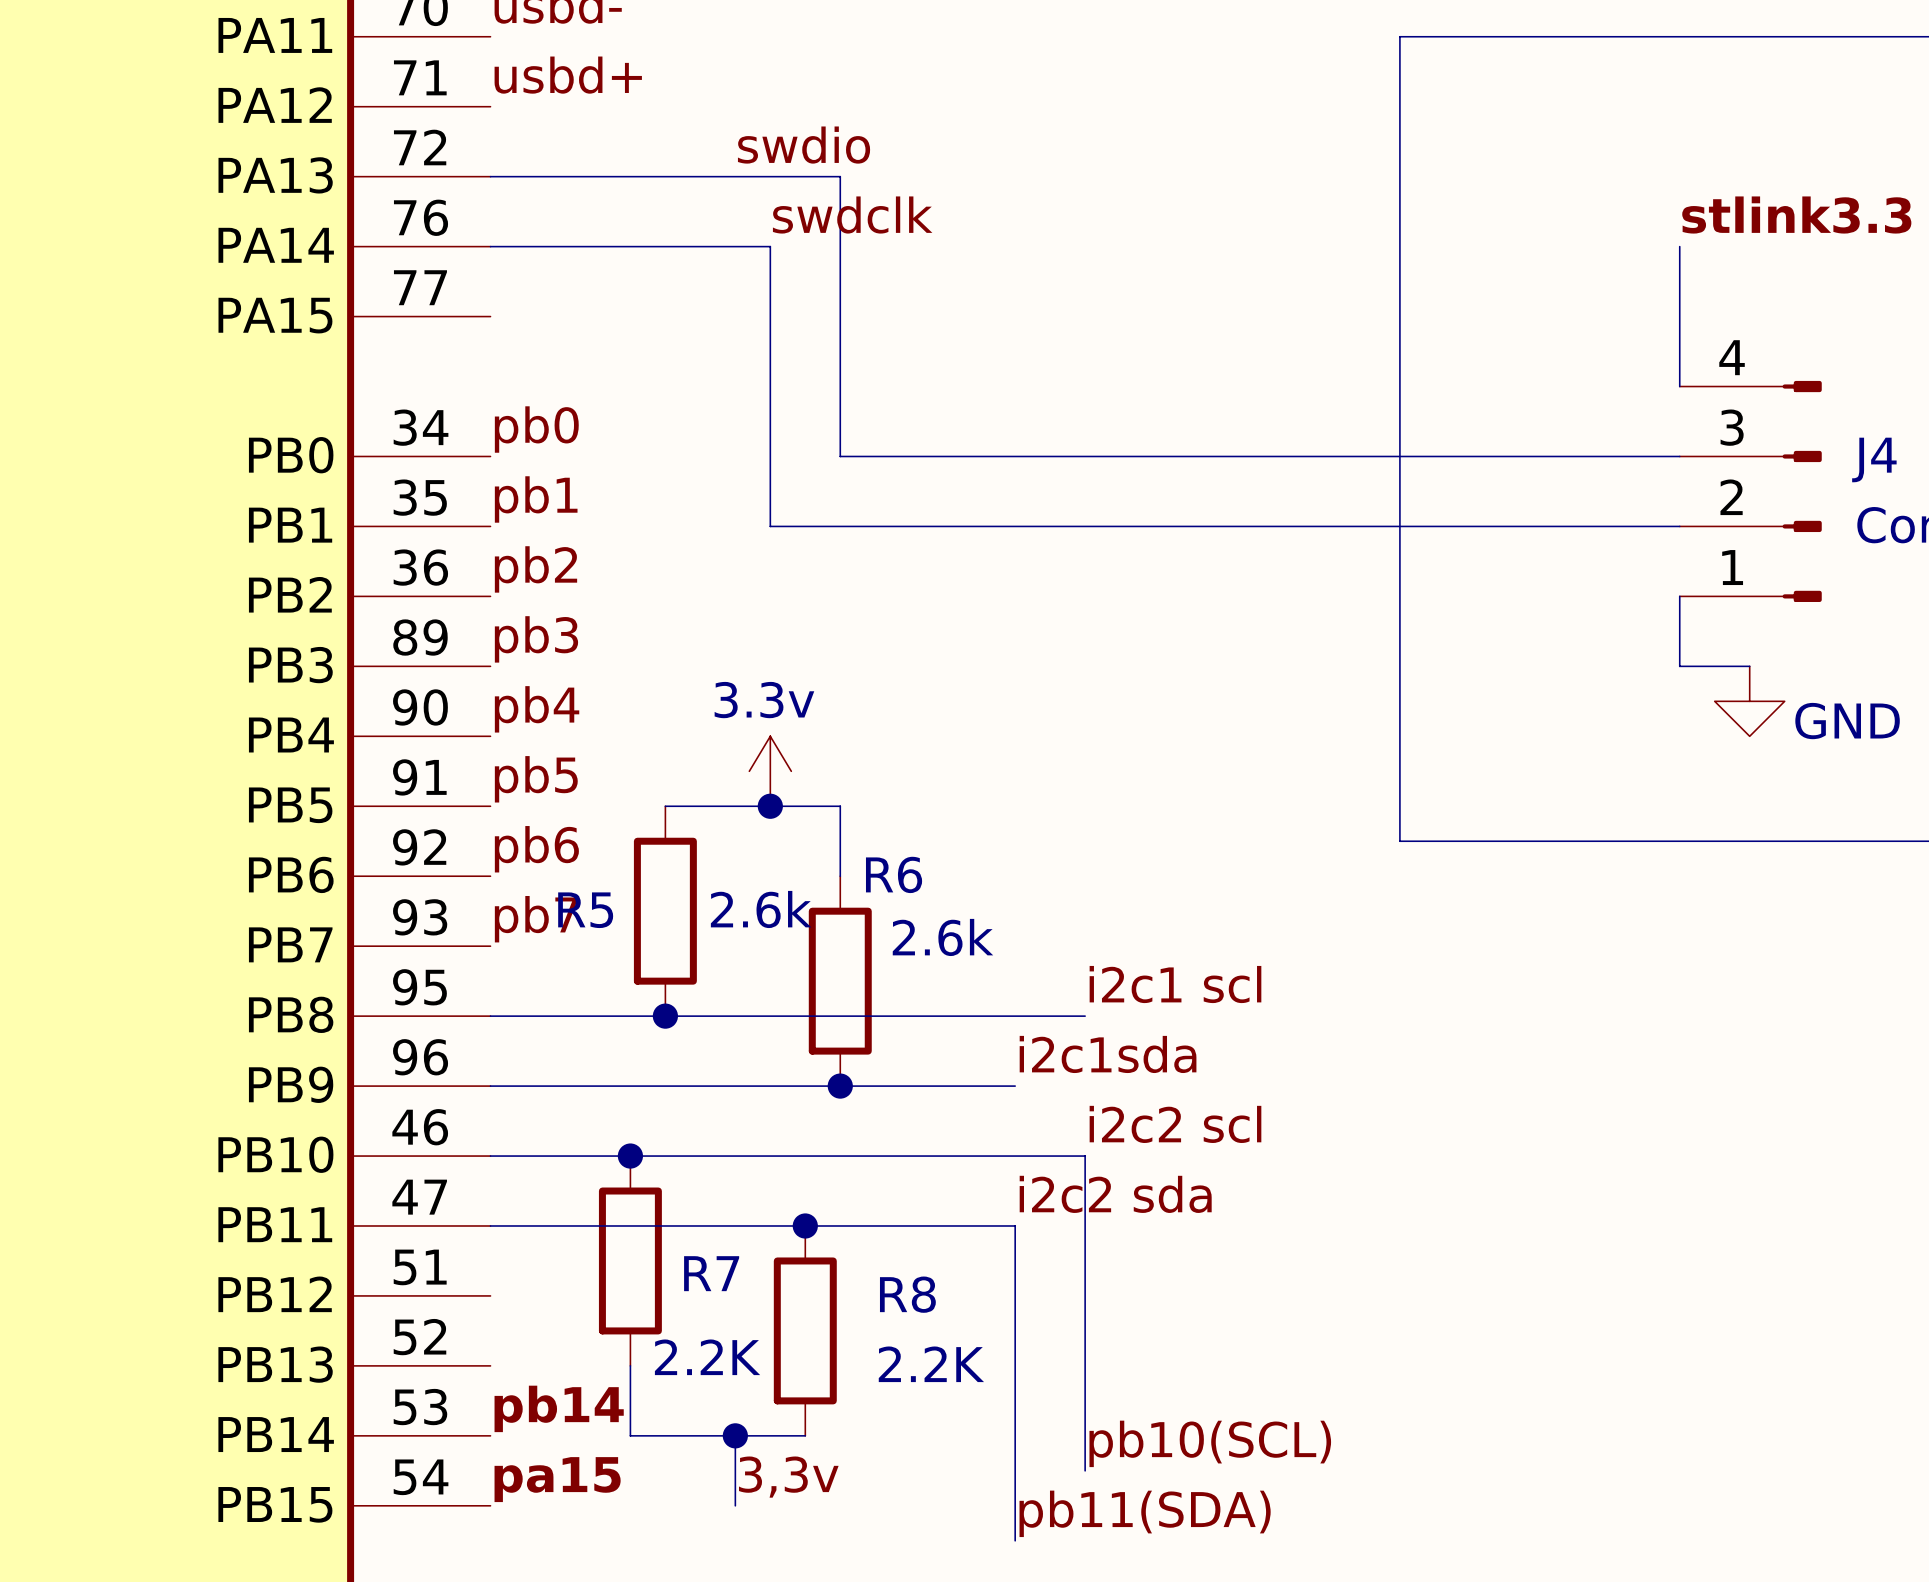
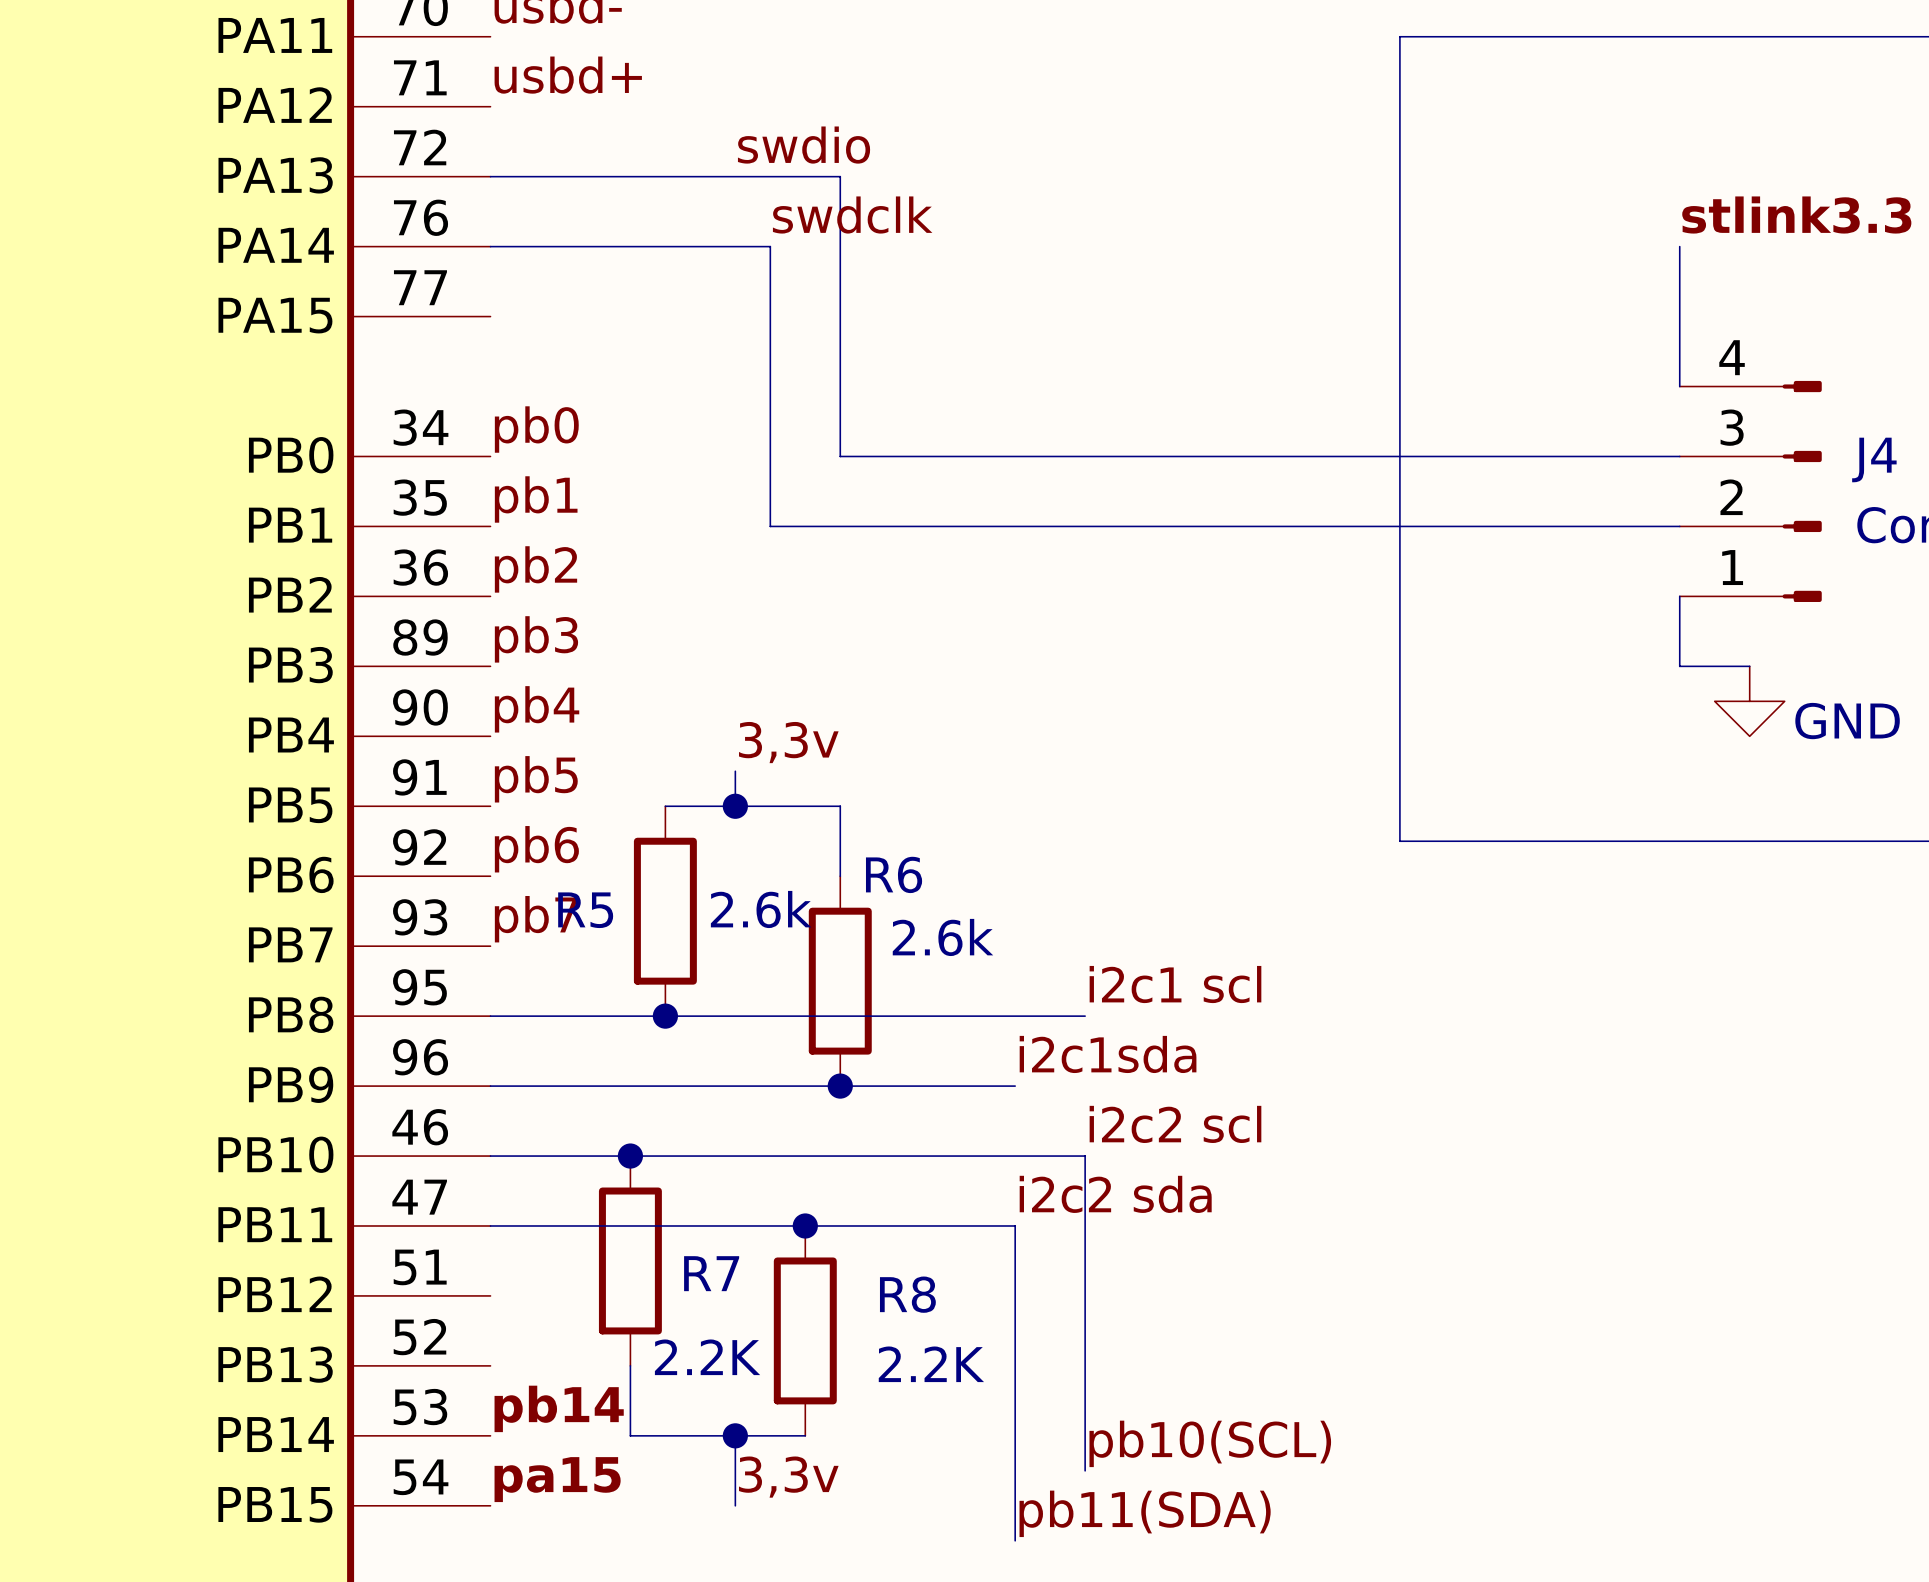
label: none -> 3,3v (788, 742)
wire: none -> (735, 771) (735, 806)
power symbol: 3.3v (770, 771) -> none
junction position: (770, 806) -> (735, 806)

